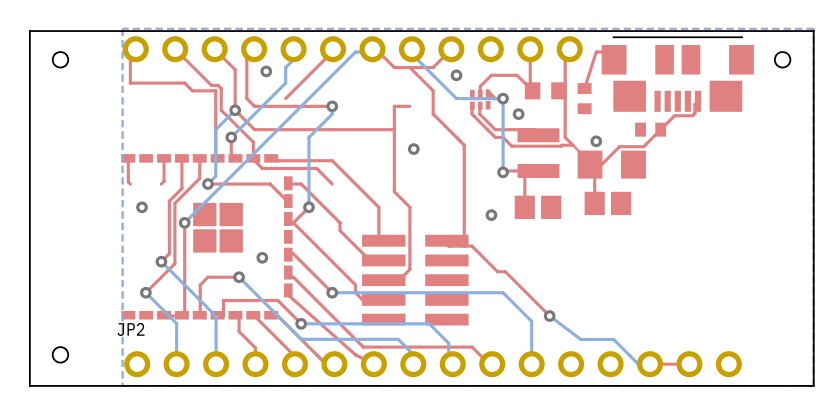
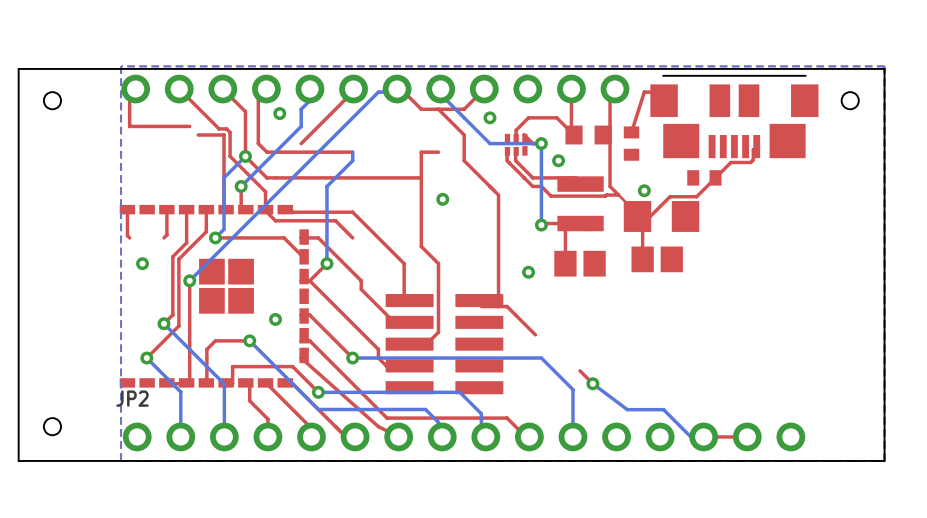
top track: (184, 83) (192, 90) -> none
via: (332, 106) -> none
top track: (497, 271) (505, 271) (538, 304) -> none

